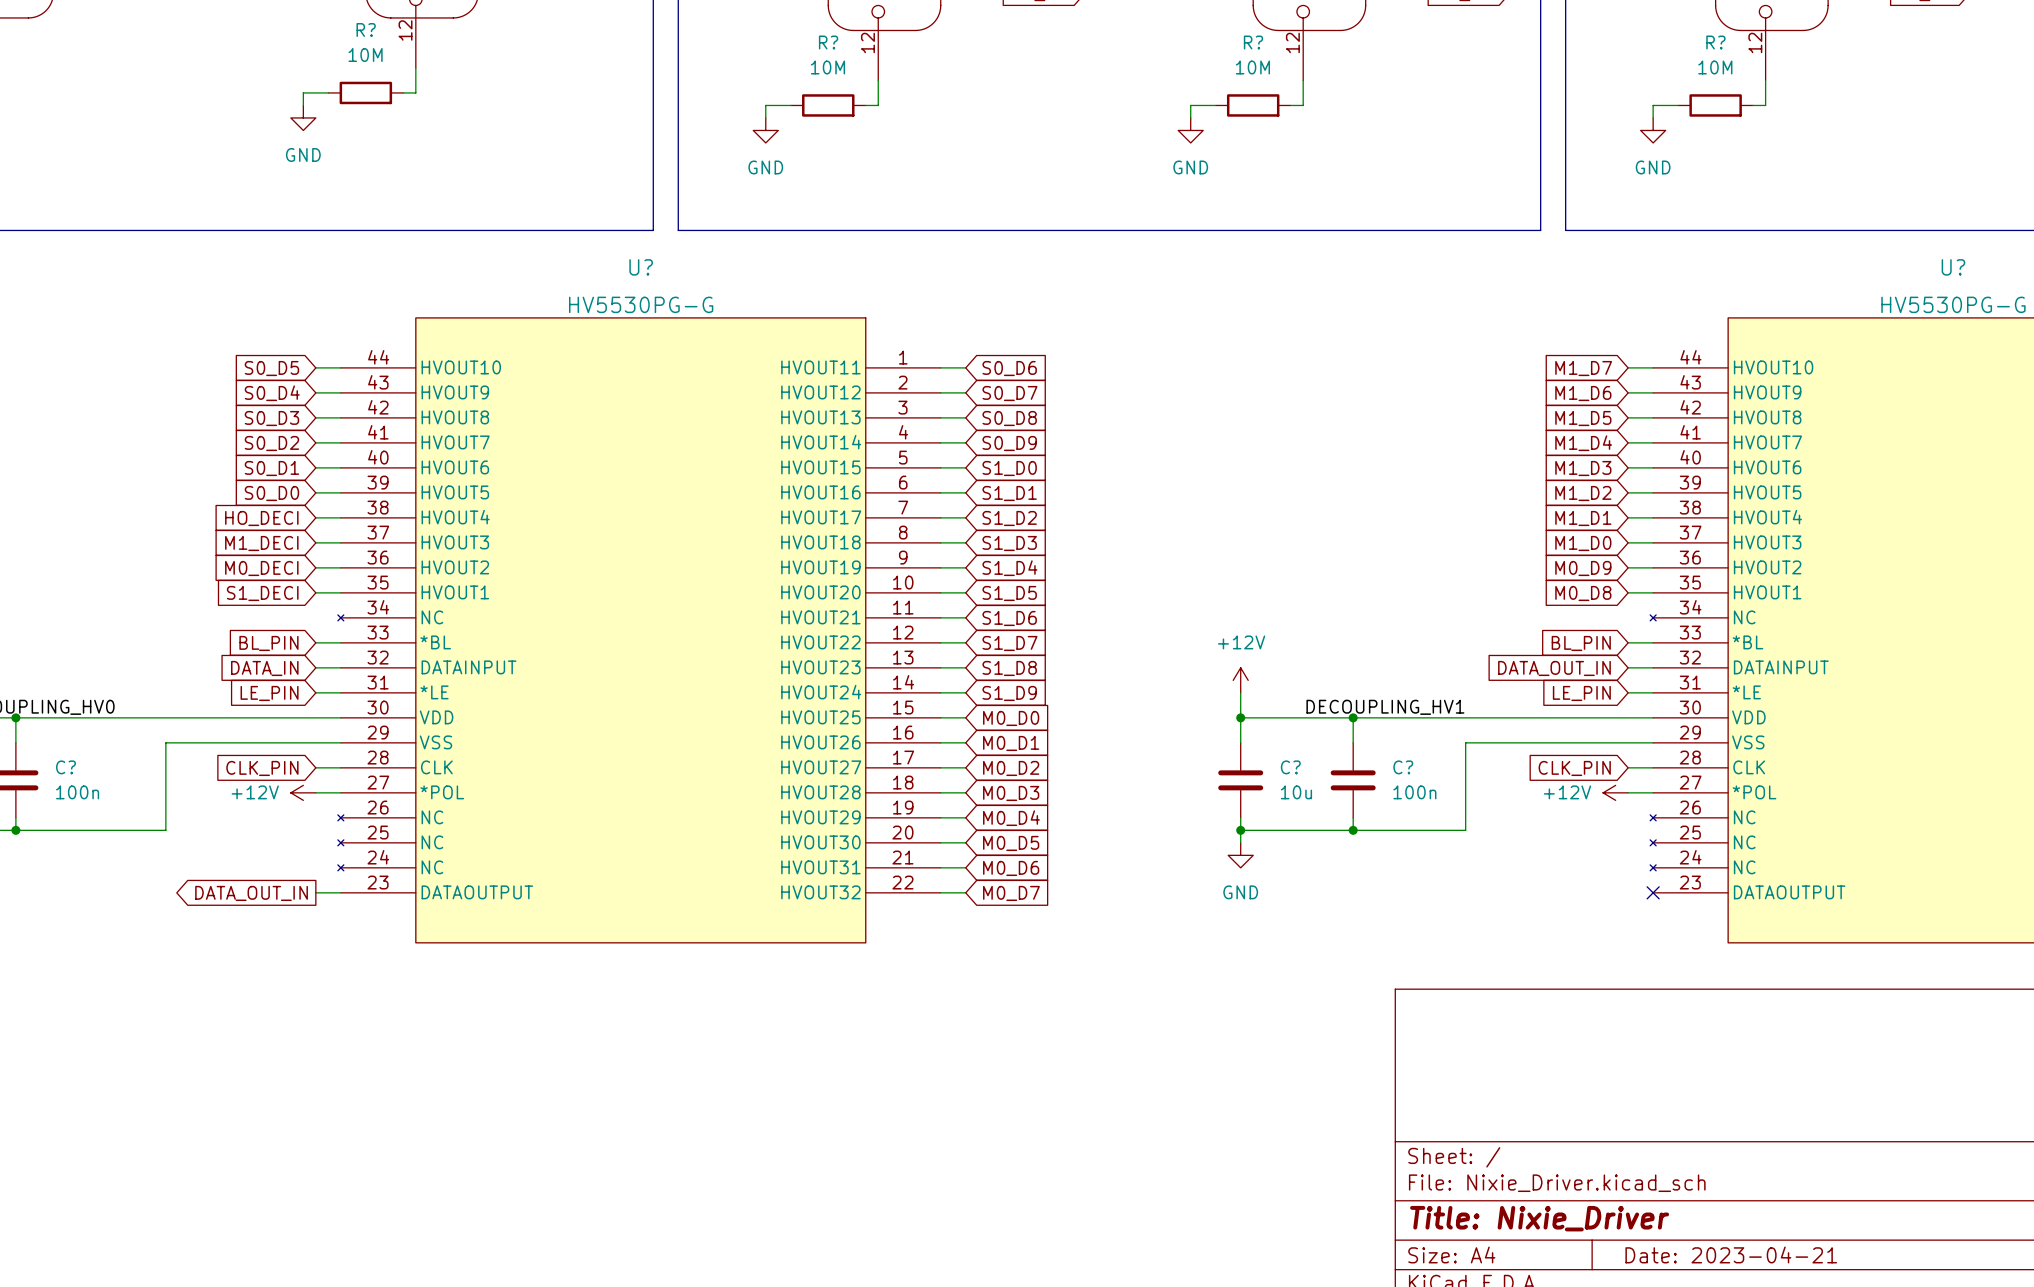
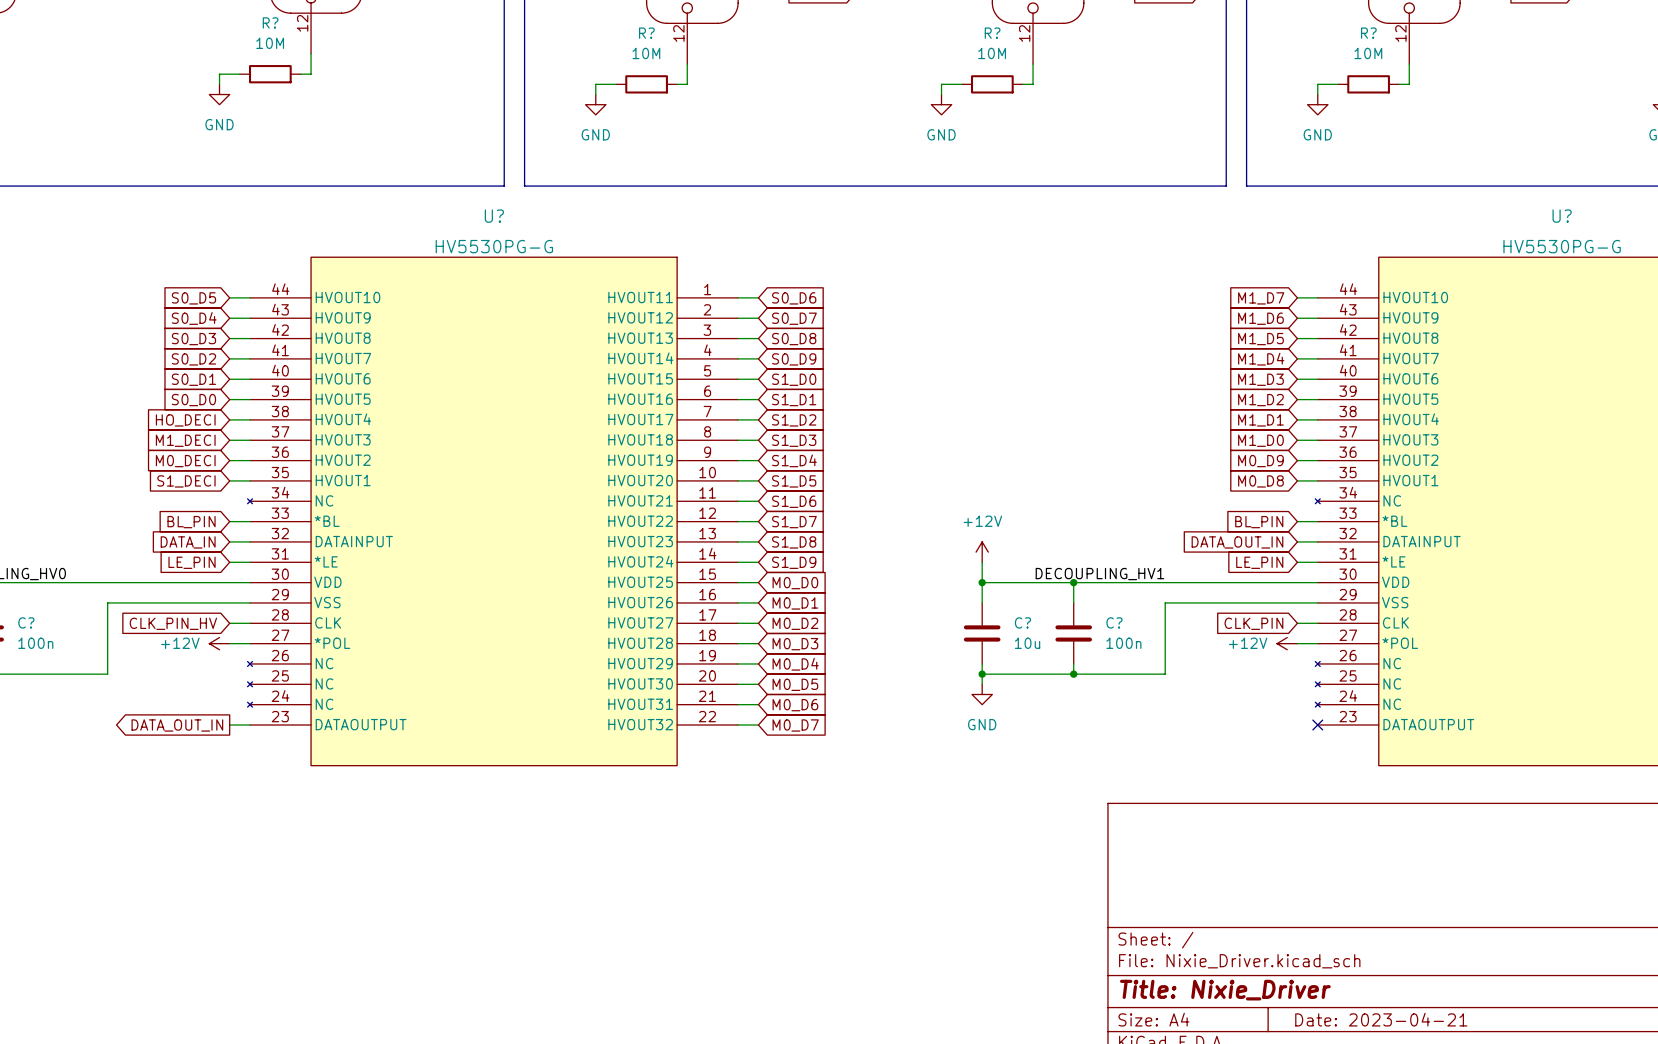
global label: CLK_PIN (262, 768) -> CLK_PIN_HV (173, 623)

